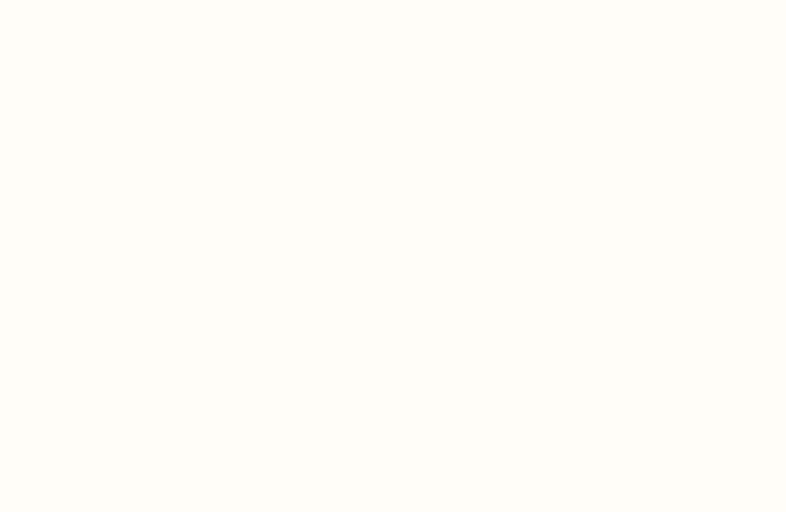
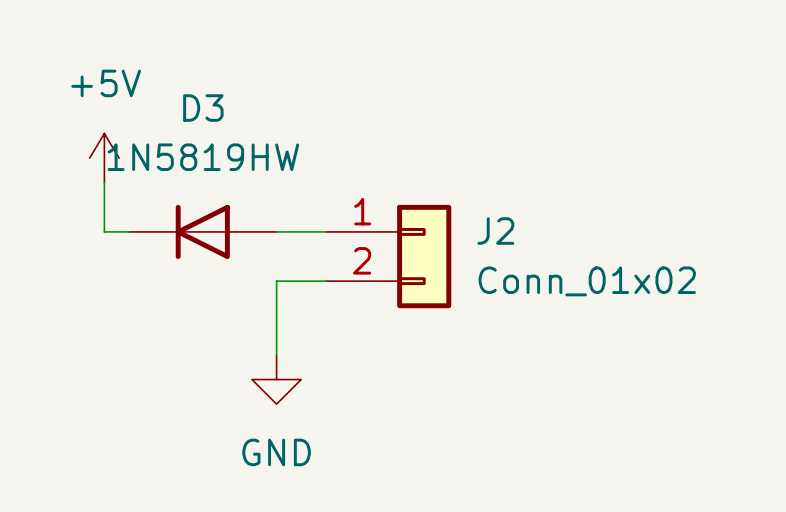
power symbol: none -> +5V (104, 158)
wire: none -> (104, 182) (104, 231) (128, 231)
D3: none -> 1N5819HW (202, 231)
wire: none -> (276, 231) (325, 231)
J2: none -> Conn_01x02 (388, 256)
wire: none -> (325, 281) (276, 281) (276, 354)
power symbol: none -> GND (276, 379)

